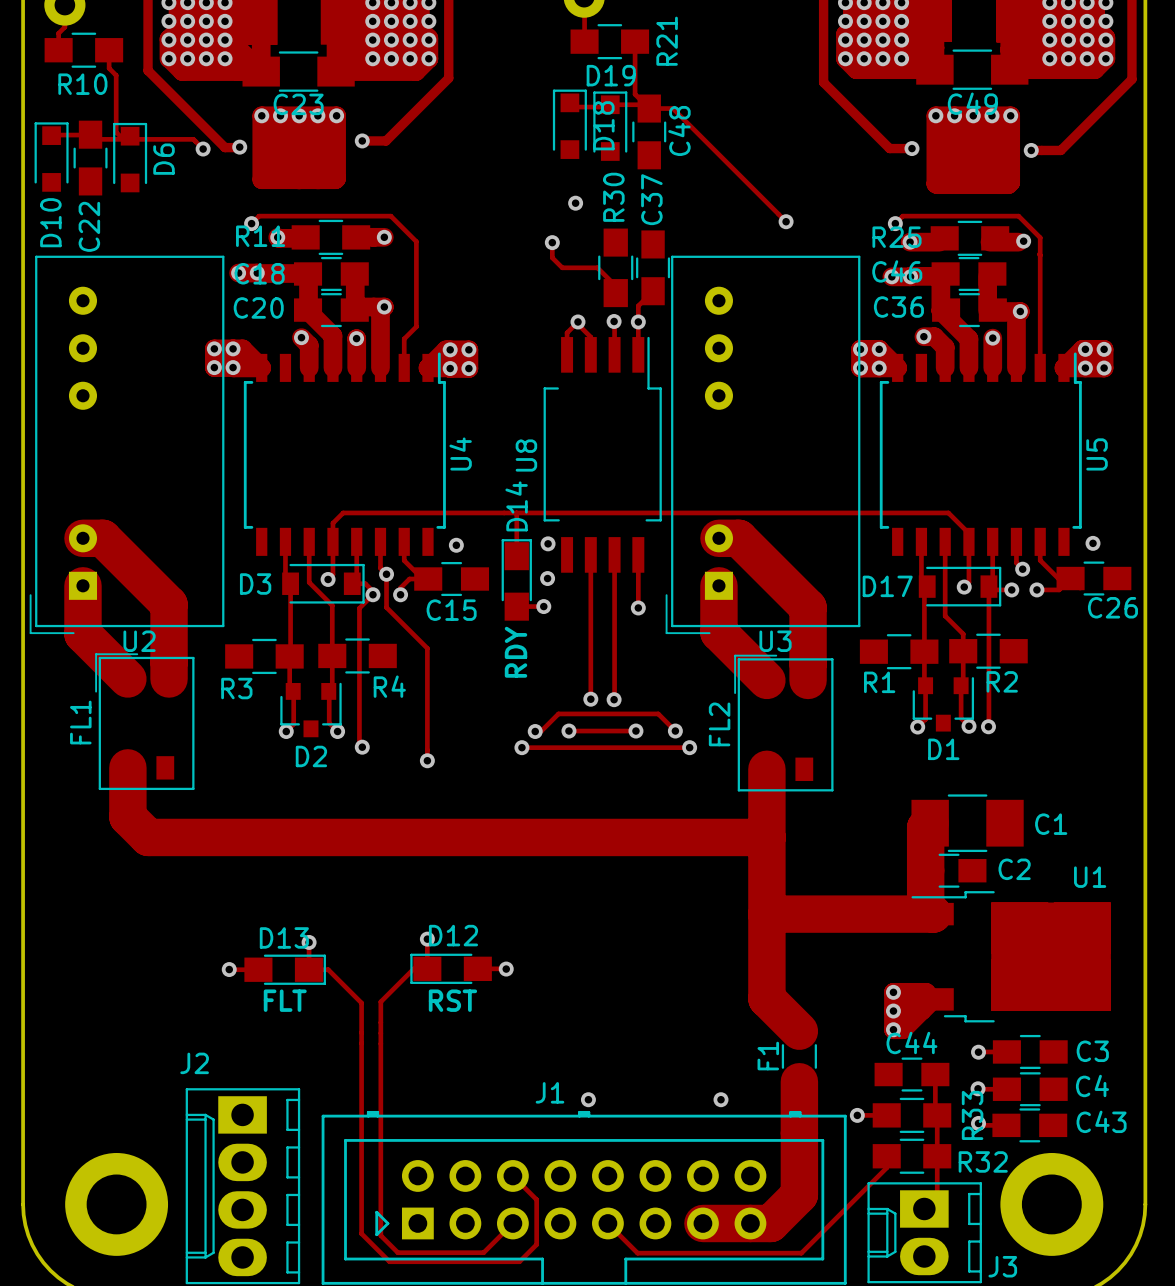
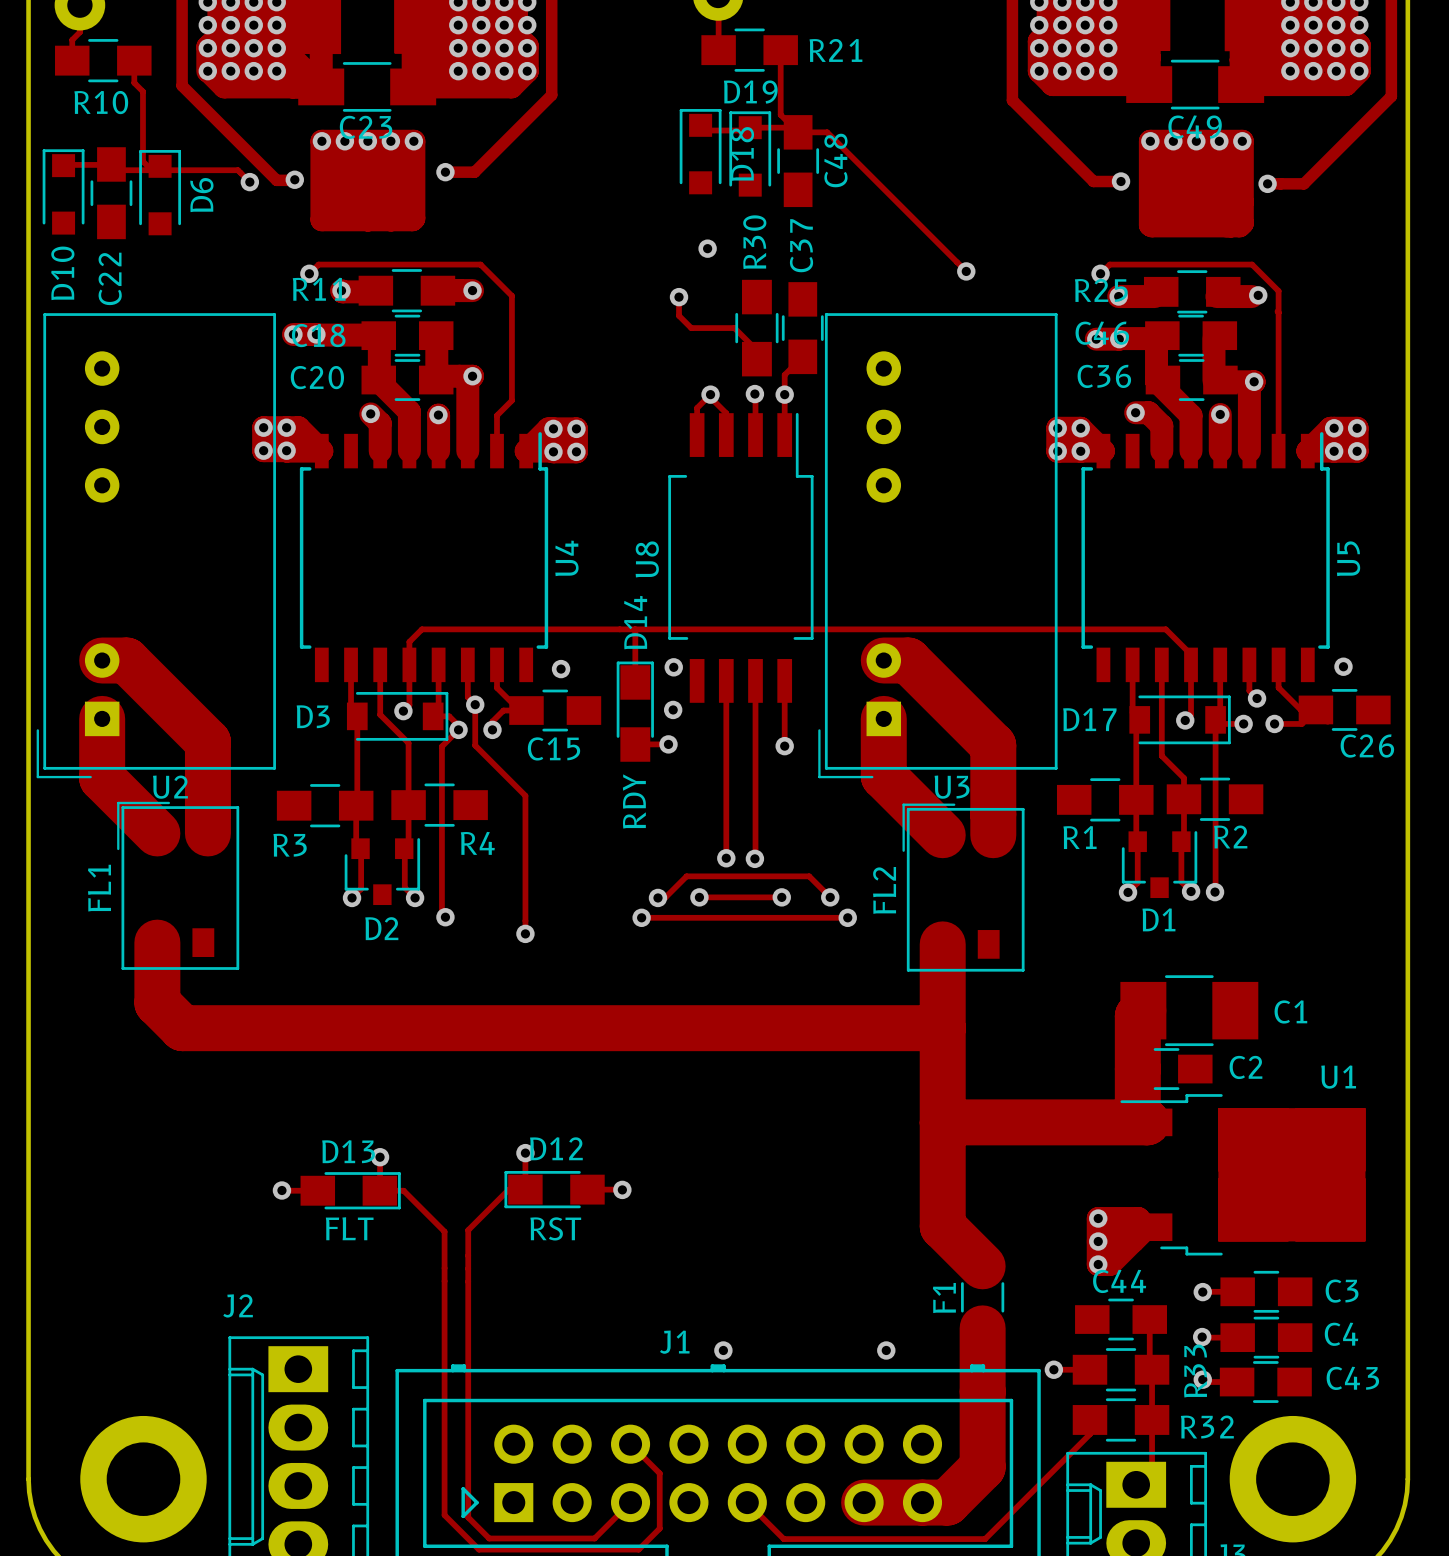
R21 name rotation: 0° (667, 41) -> 90° clockwise (835, 50)

